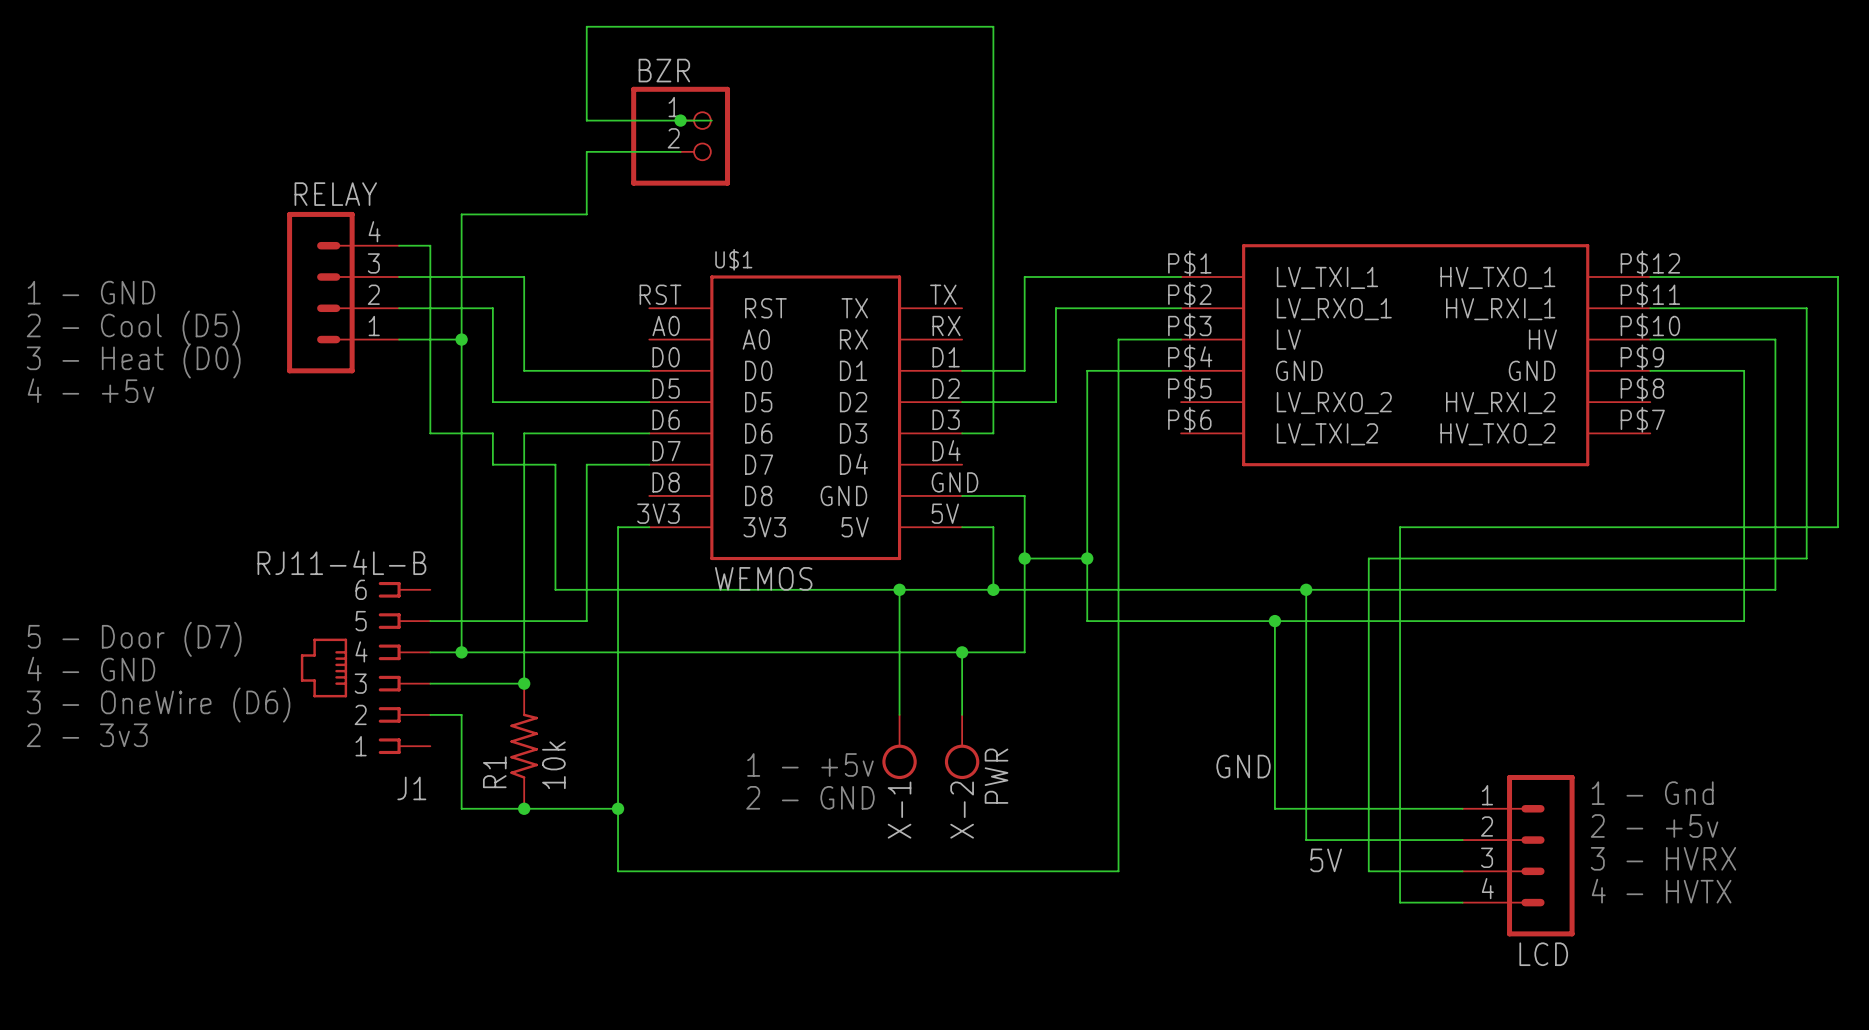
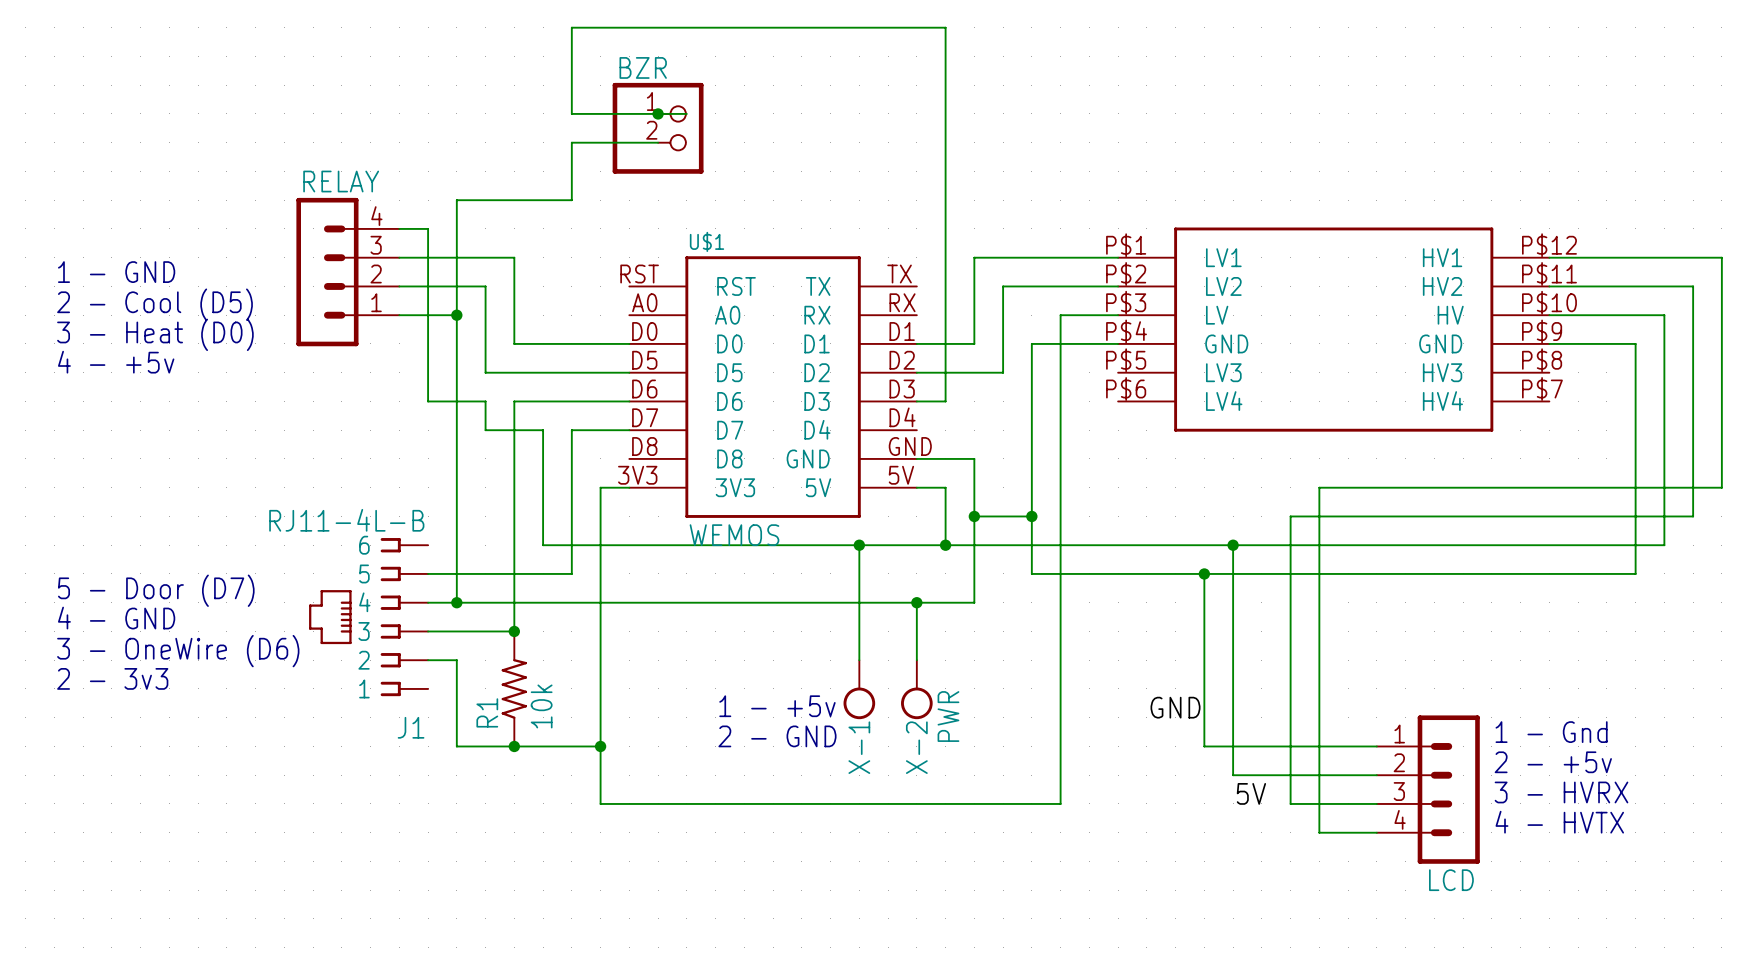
part pin name: LV_TXI_1 (1327, 277) -> LV1 (1223, 257)
part pin name: HV_TXO_1 (1497, 277) -> HV1 (1442, 257)
part pin name: LV_RXO_1 (1334, 309) -> LV2 (1223, 286)
part pin name: HV_RXI_1 (1500, 309) -> HV2 (1442, 286)
part pin name: LV_RXO_2 (1334, 403) -> LV3 (1223, 372)
part pin name: HV_RXI_2 (1500, 403) -> HV3 (1442, 372)
part pin name: LV_TXI_2 (1327, 434) -> LV4 (1224, 401)
part pin name: HV_TXO_2 (1497, 434) -> HV4 (1442, 401)

